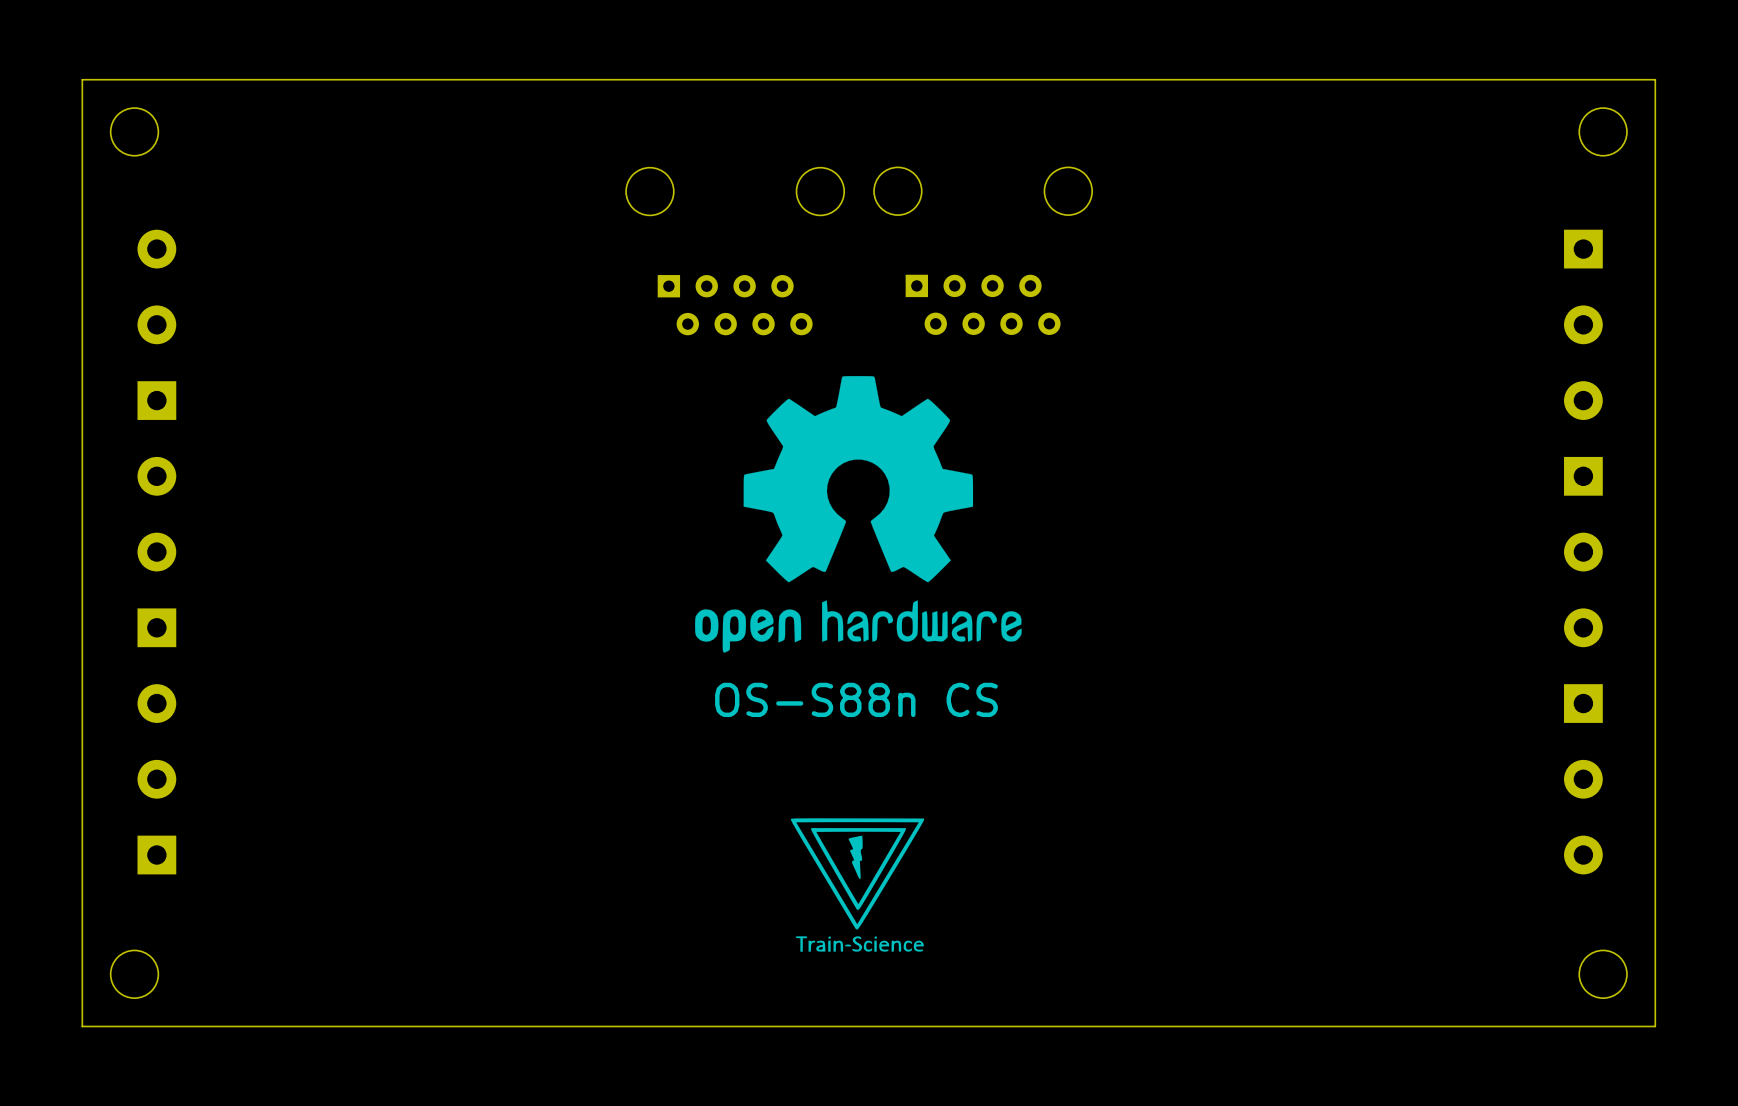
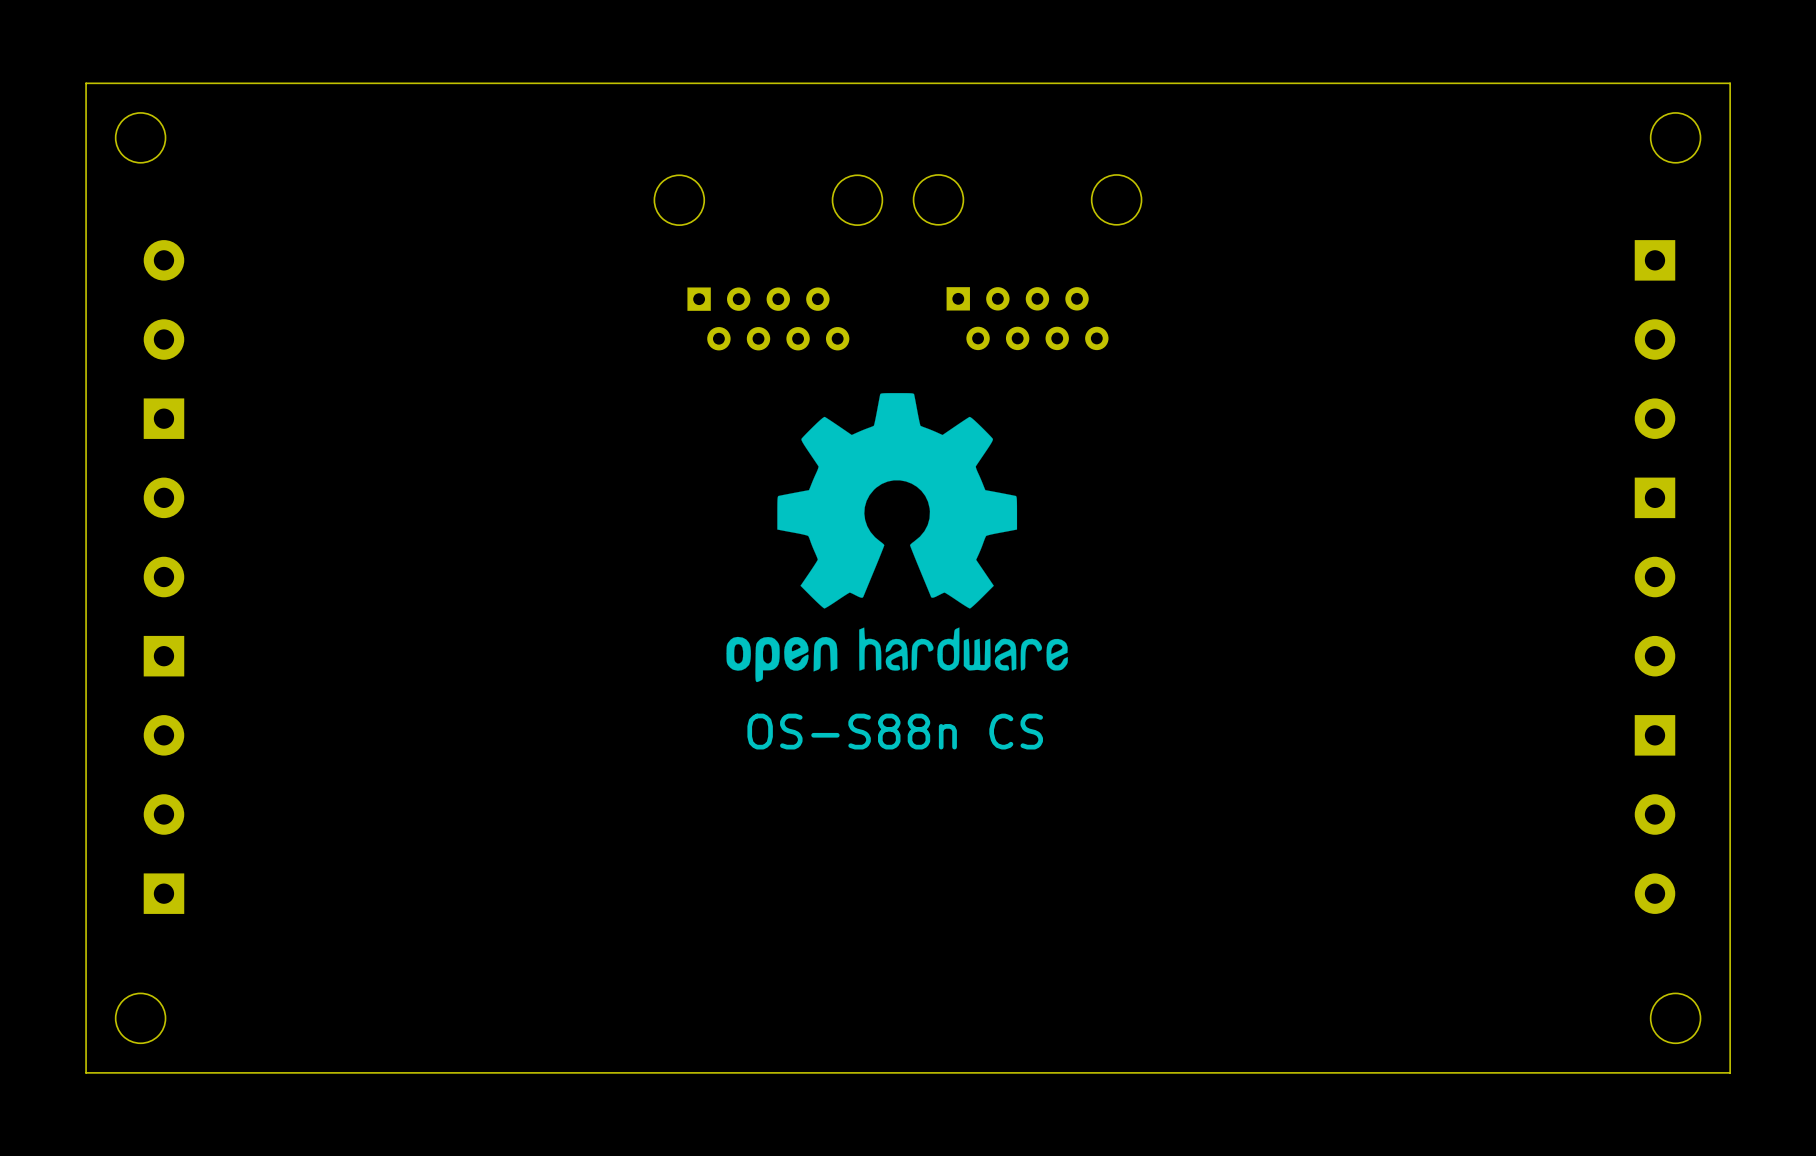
drawing: [790, 818, 925, 952] -> none

